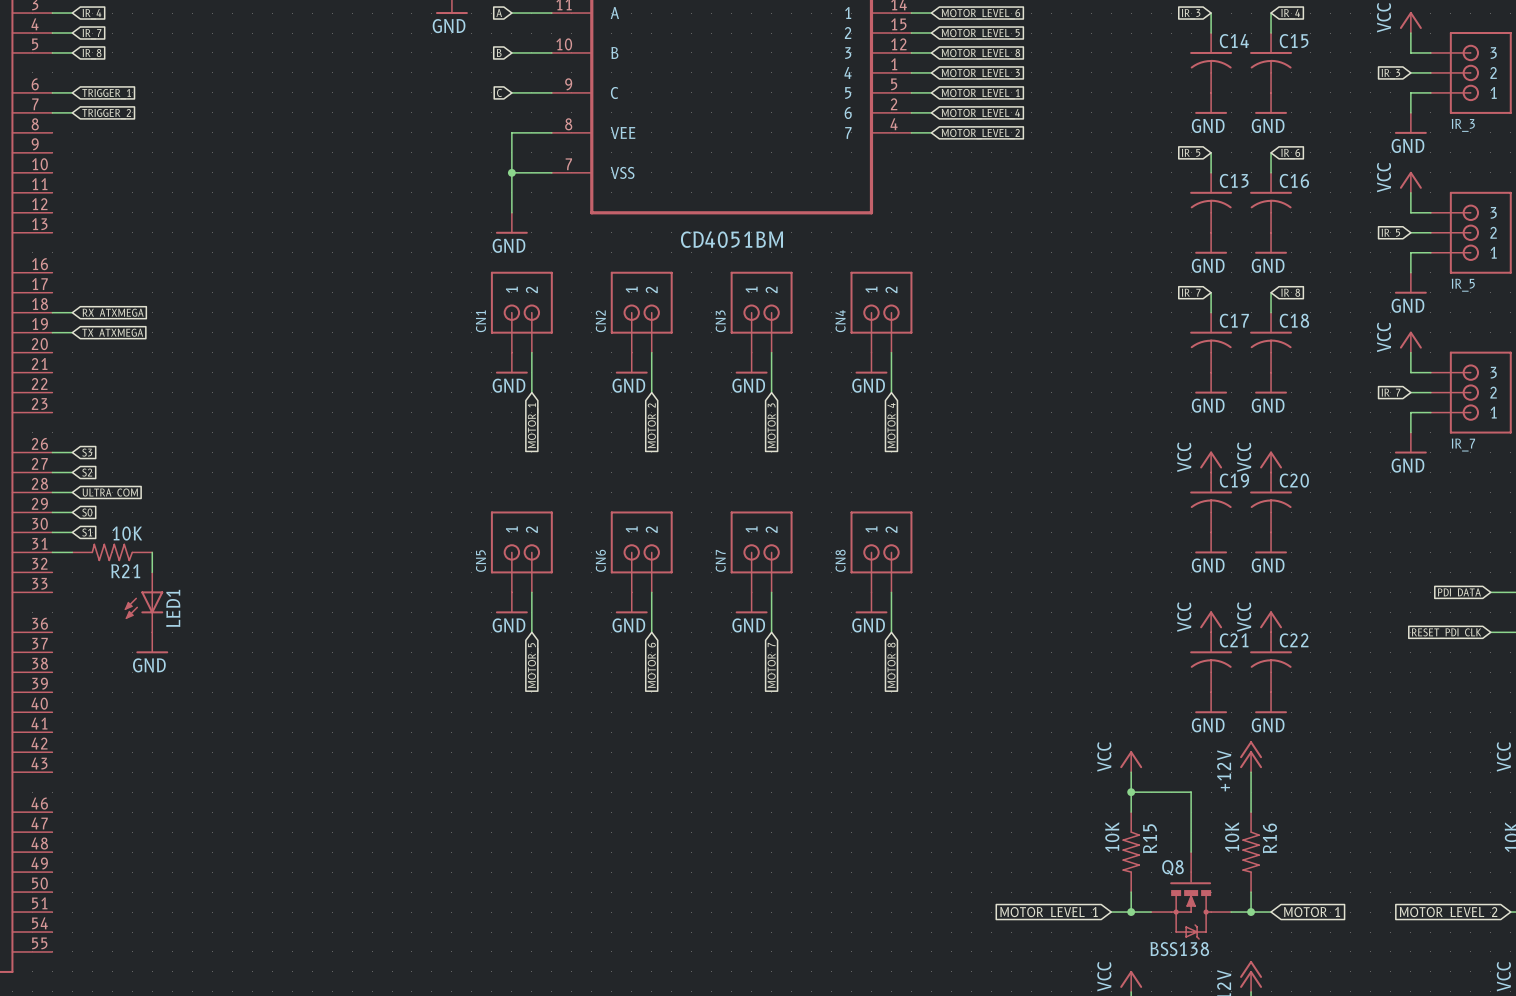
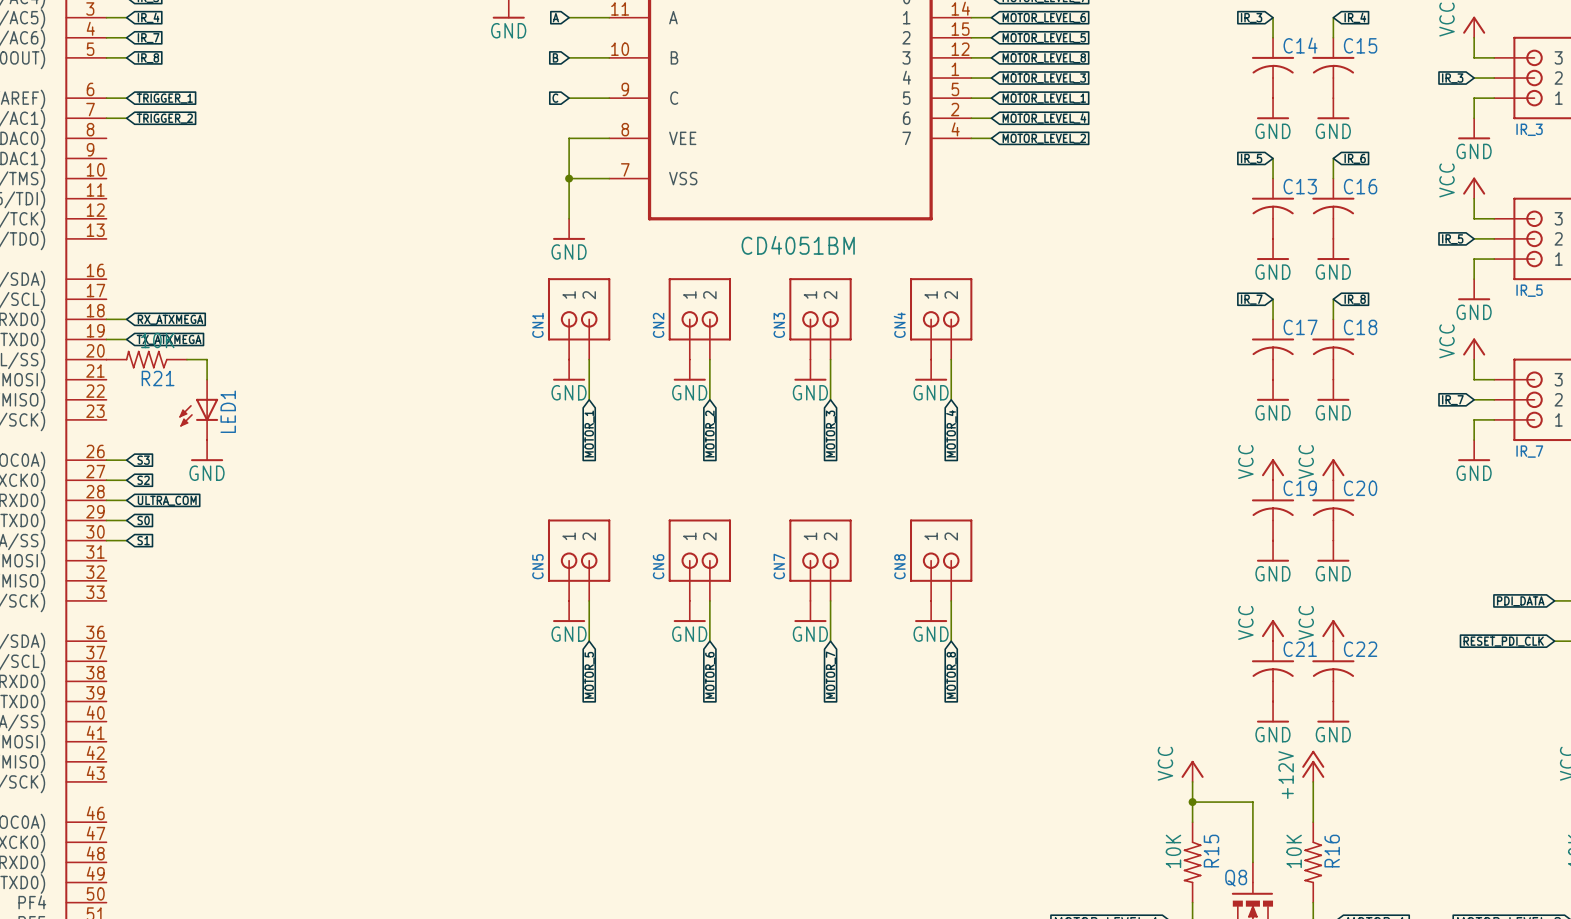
wire: none -> (186, 359) (207, 359) (207, 379)
power symbol: none -> GND (207, 450)
wire: (52, 552) (72, 552) -> none
R21 position: (112, 552) -> (146, 359)
wire: (152, 552) (152, 572) -> none
LED1 position: (143, 602) -> (198, 409)
power symbol: GND (152, 642) -> none

